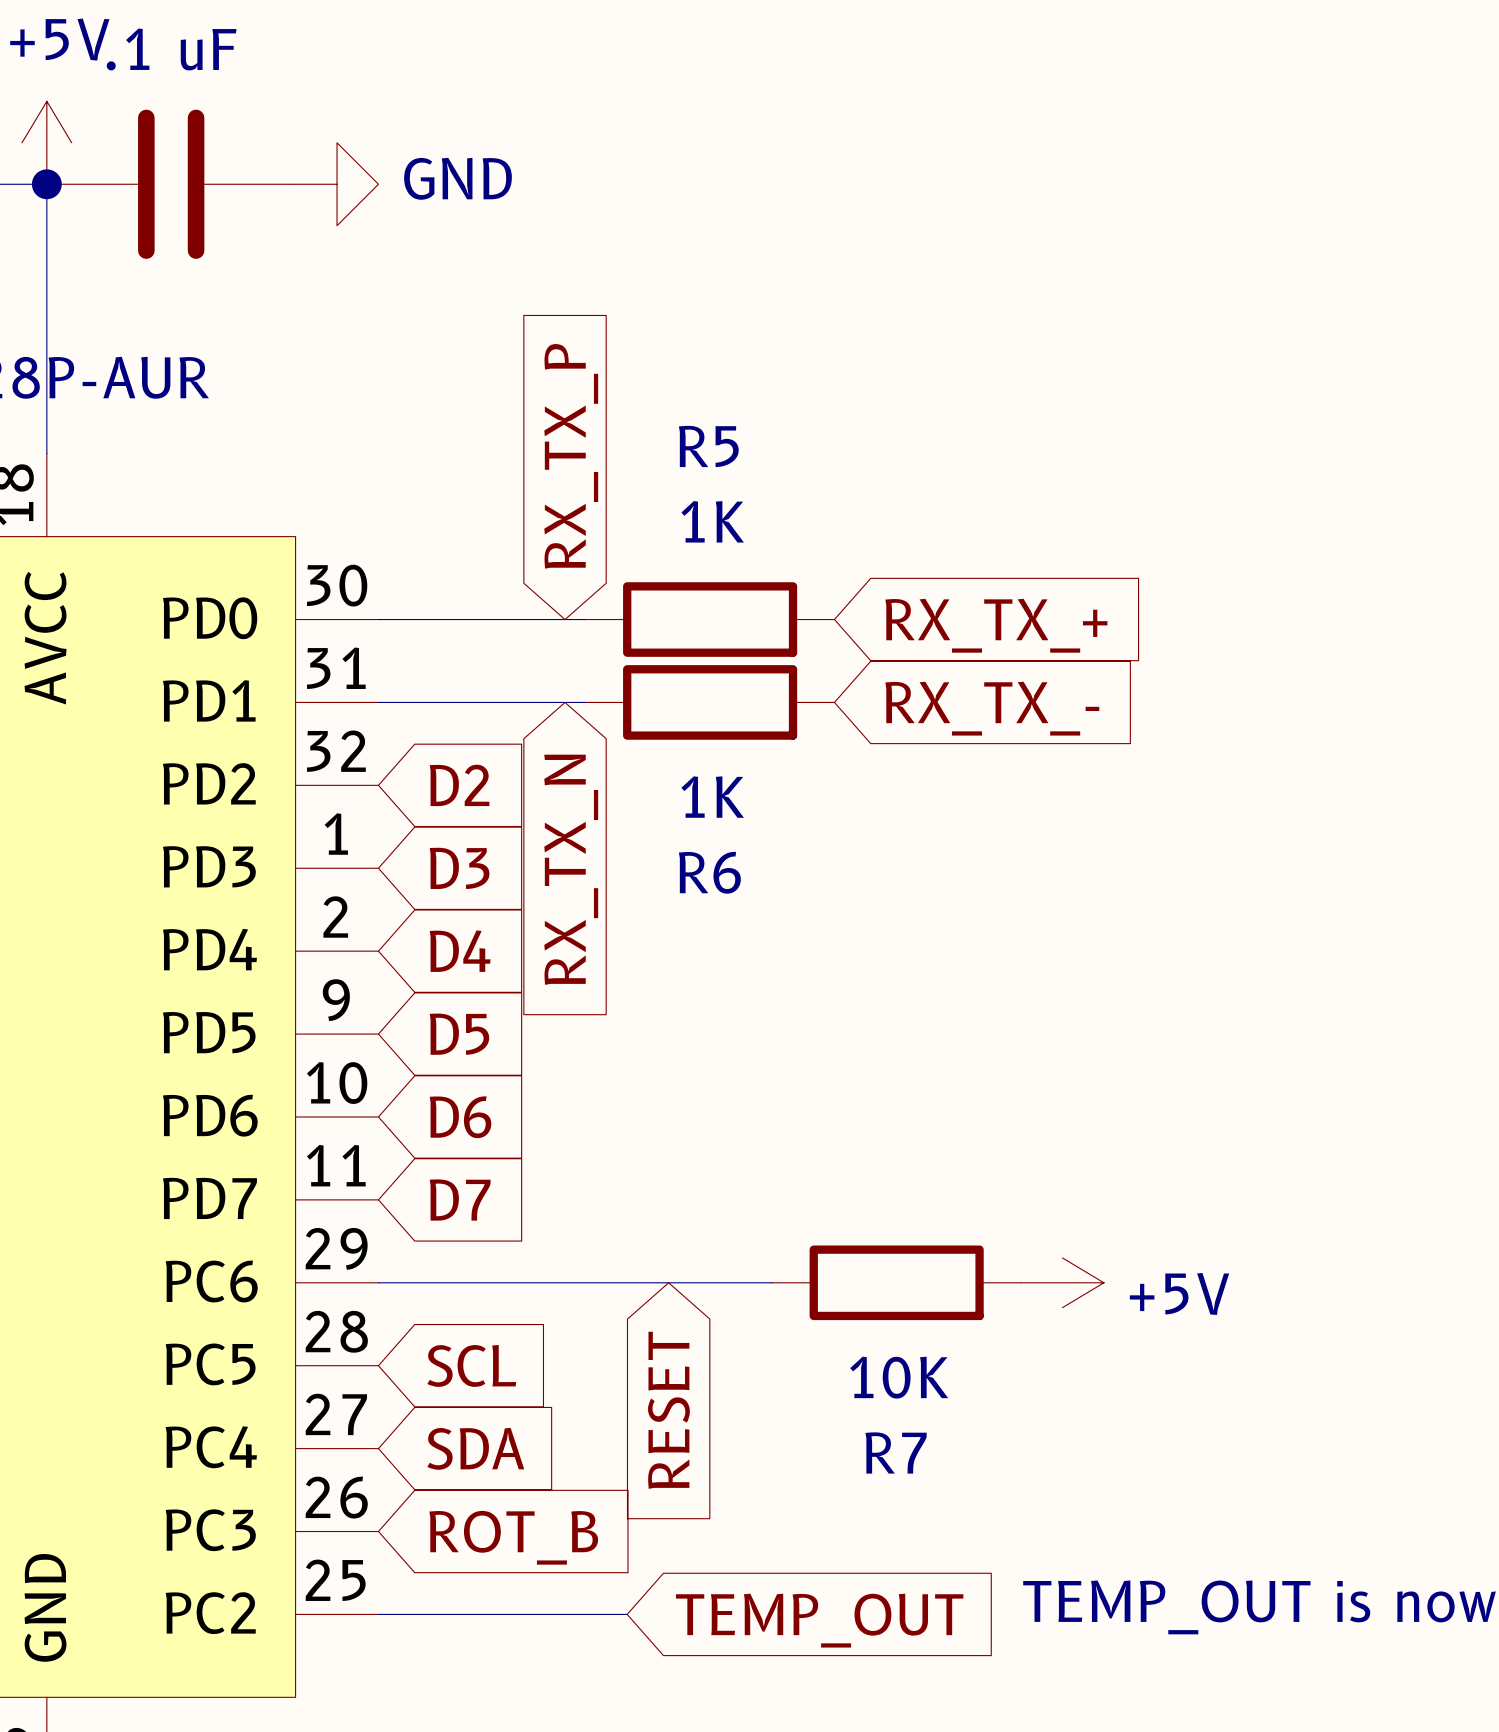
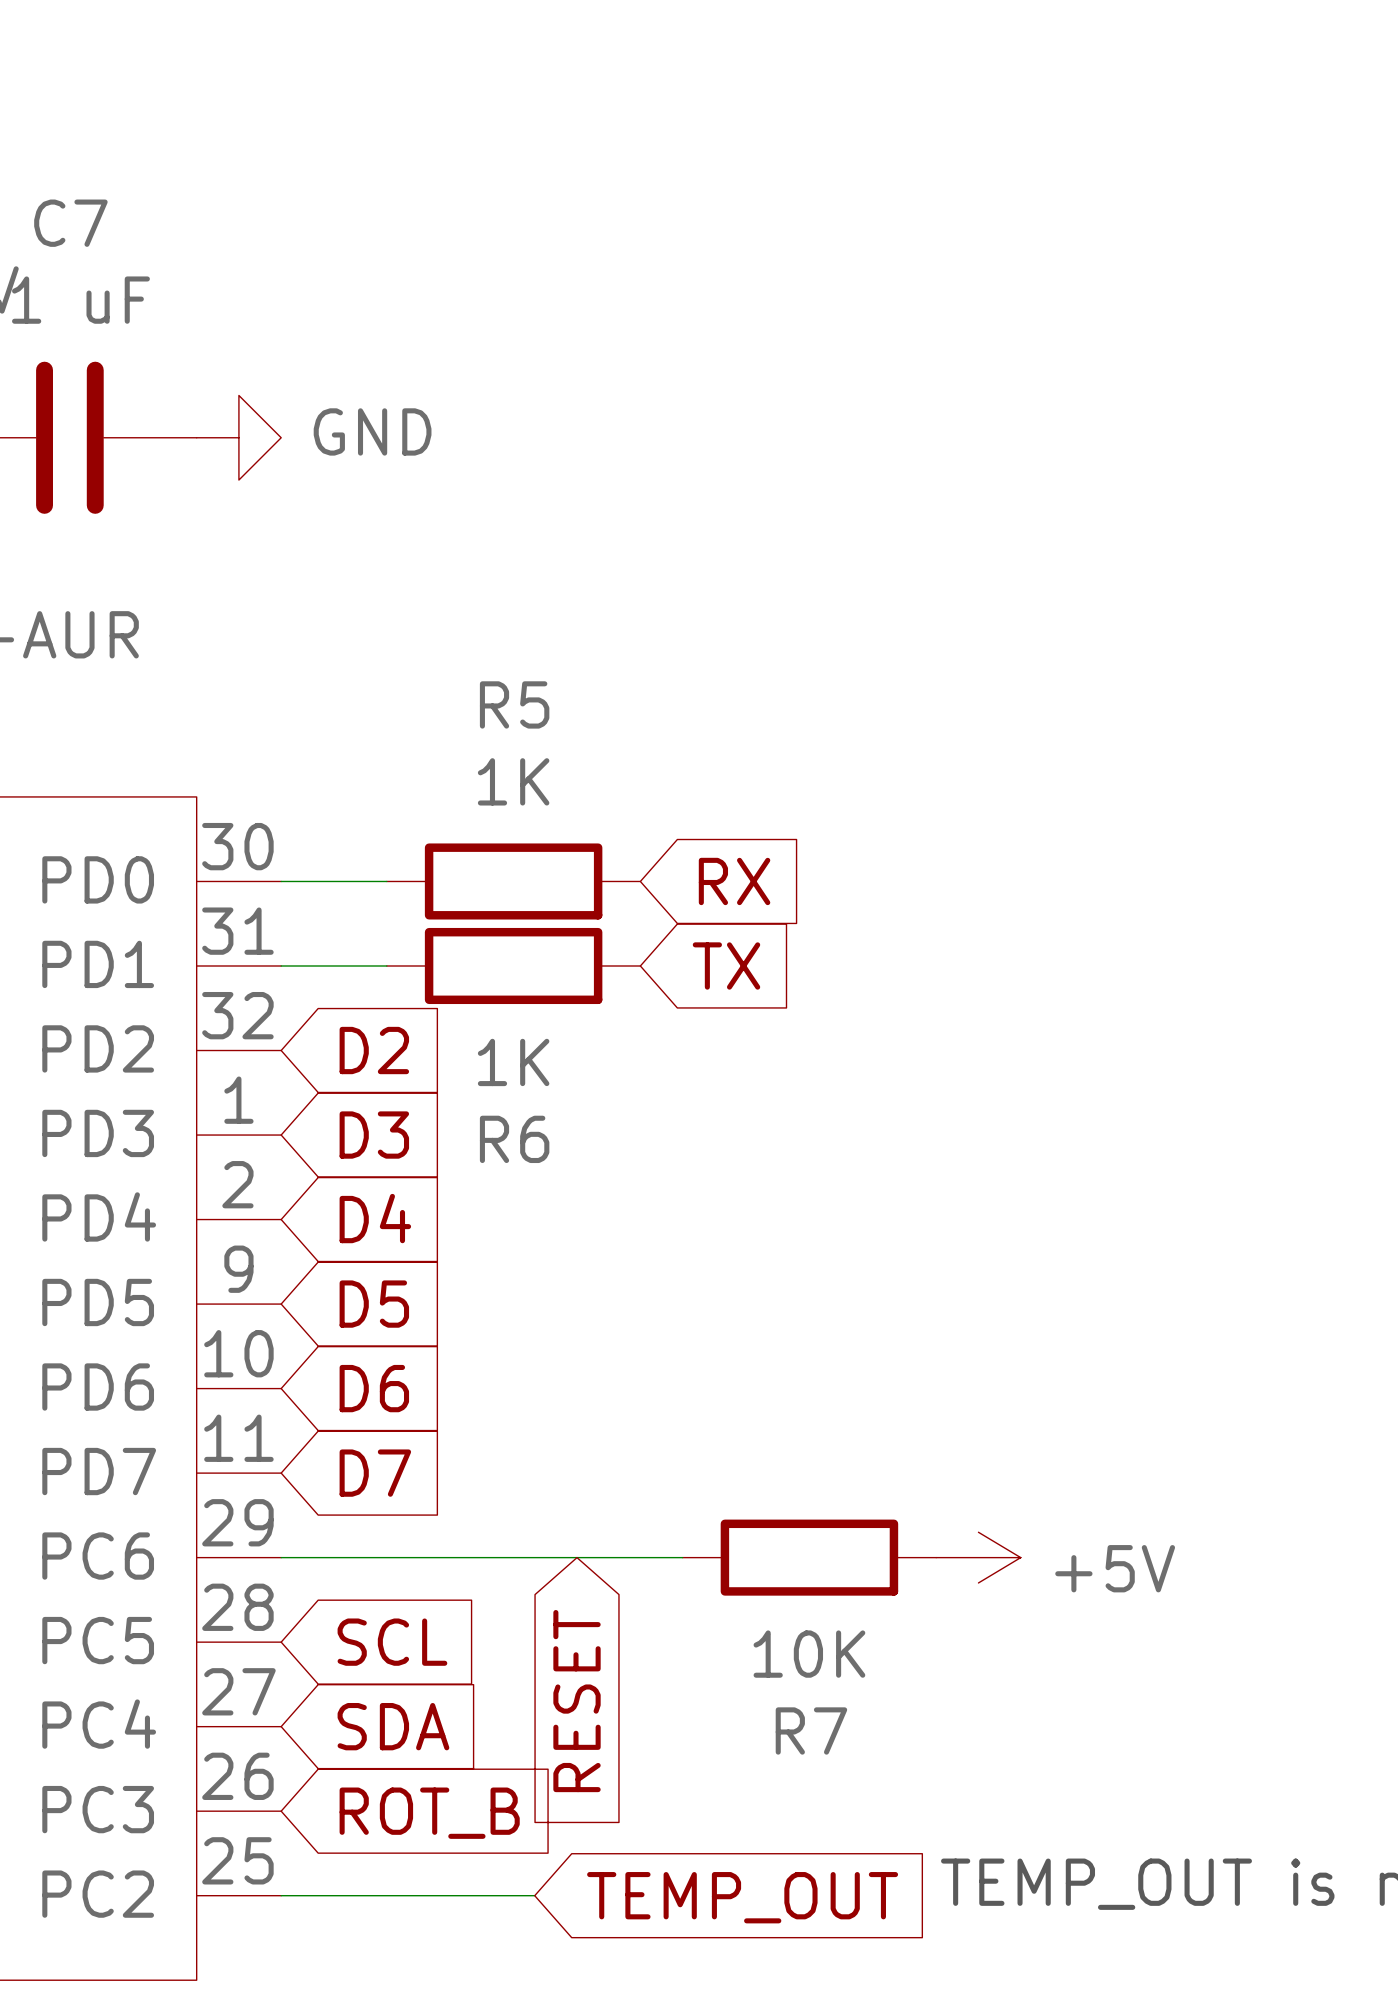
global label: RX_TX_P (571, 456) -> none
wire: (482, 619) (585, 619) -> none
R5 position: (710, 619) -> (513, 881)
global label: none -> RX (734, 881)
global label: RX_TX_+ (996, 625) -> none
wire: (482, 702) (585, 702) -> none
R6 position: (710, 702) -> (513, 965)
global label: none -> TX (726, 965)
global label: RX_TX_- (992, 708) -> none
global label: RX_TX_N (571, 869) -> none

